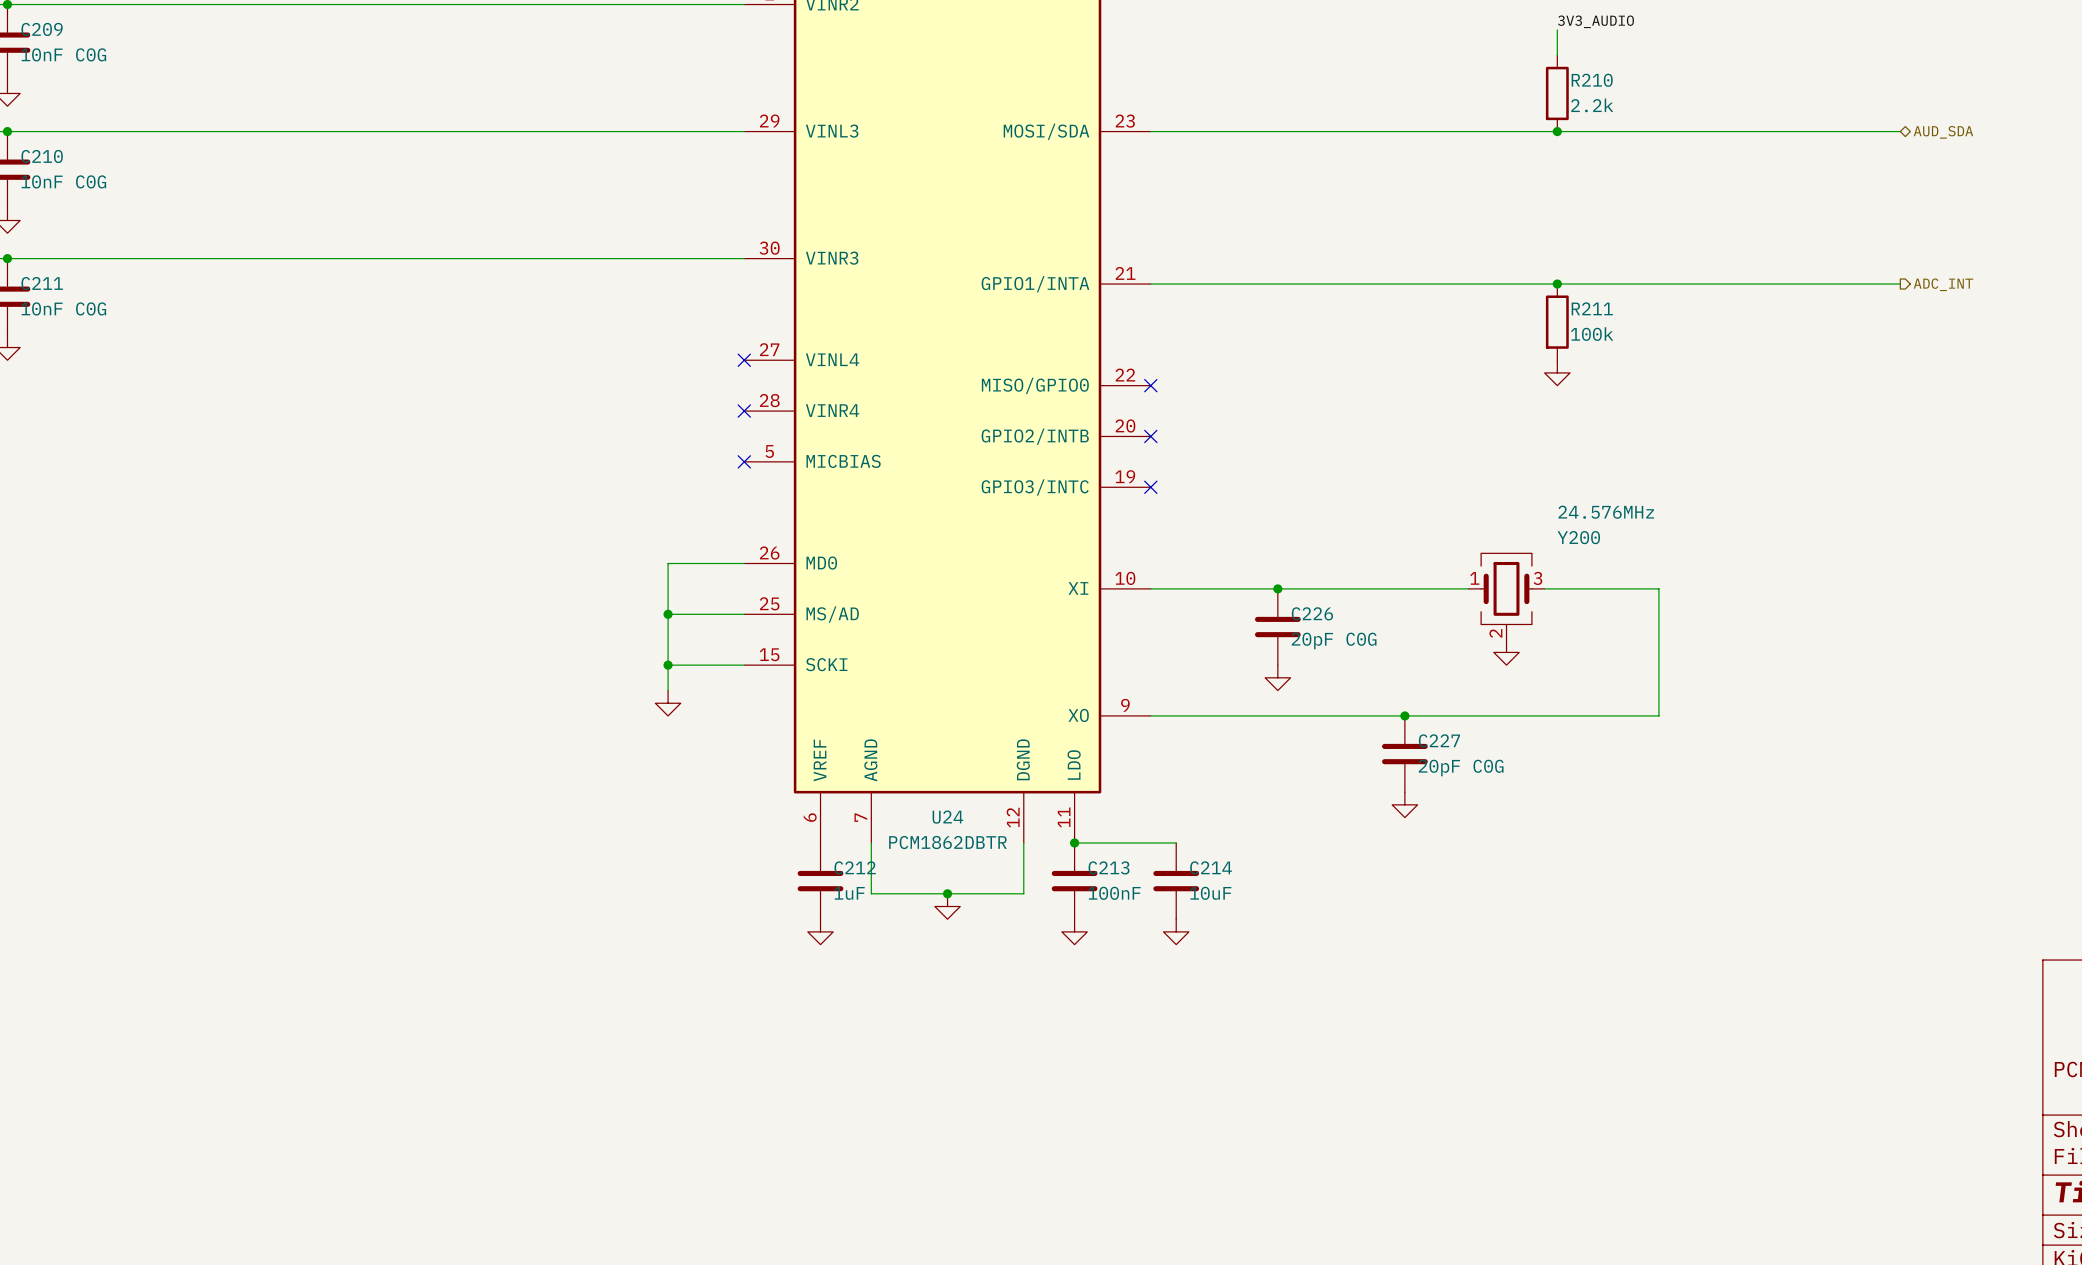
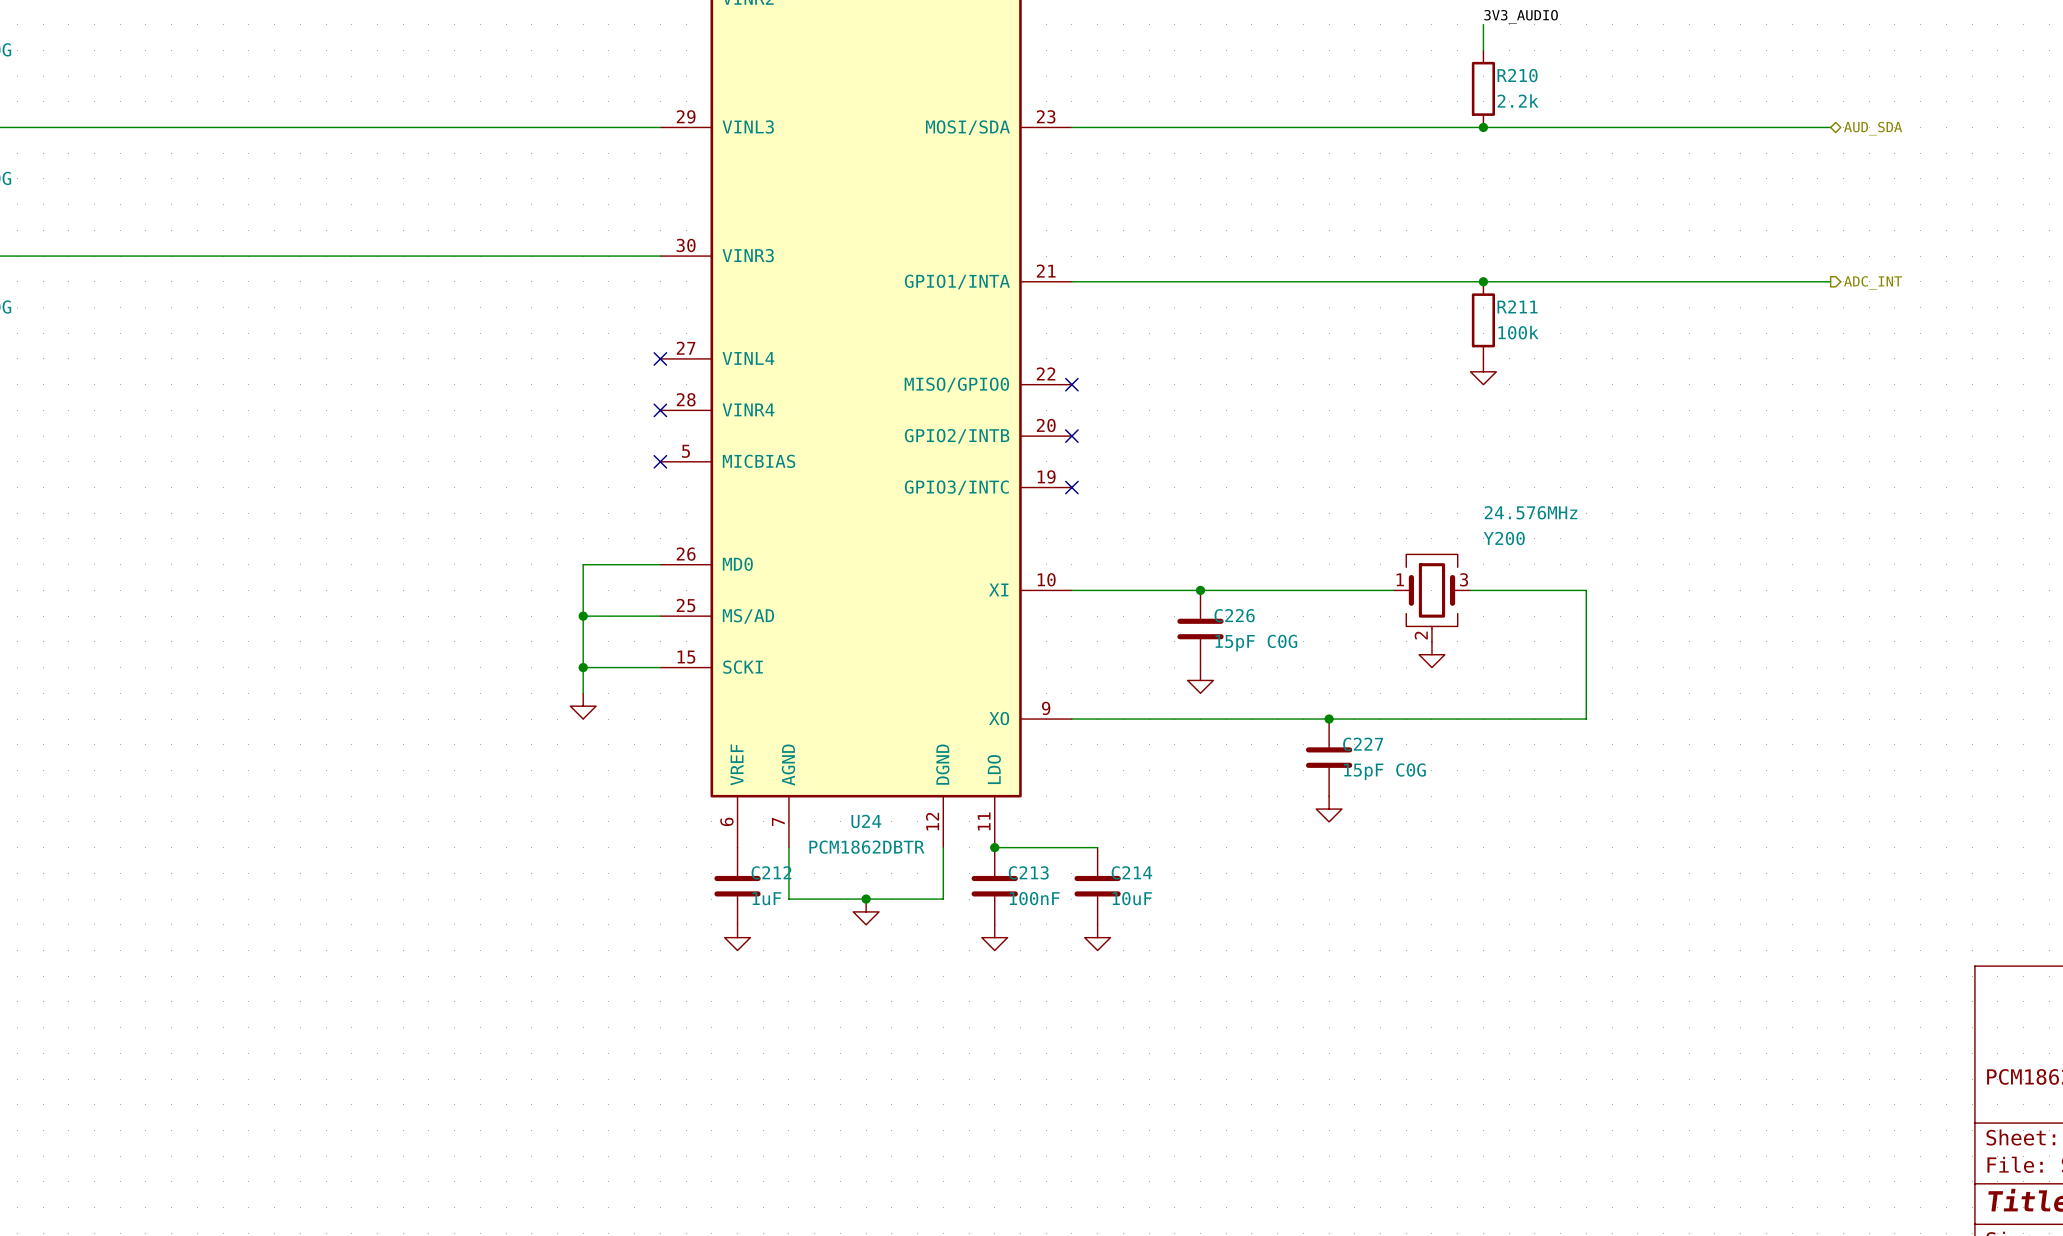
C226 value: 20pF C0G (1334, 640) -> 15pF C0G (1256, 643)
C227 value: 20pF C0G (1461, 767) -> 15pF C0G (1384, 771)

